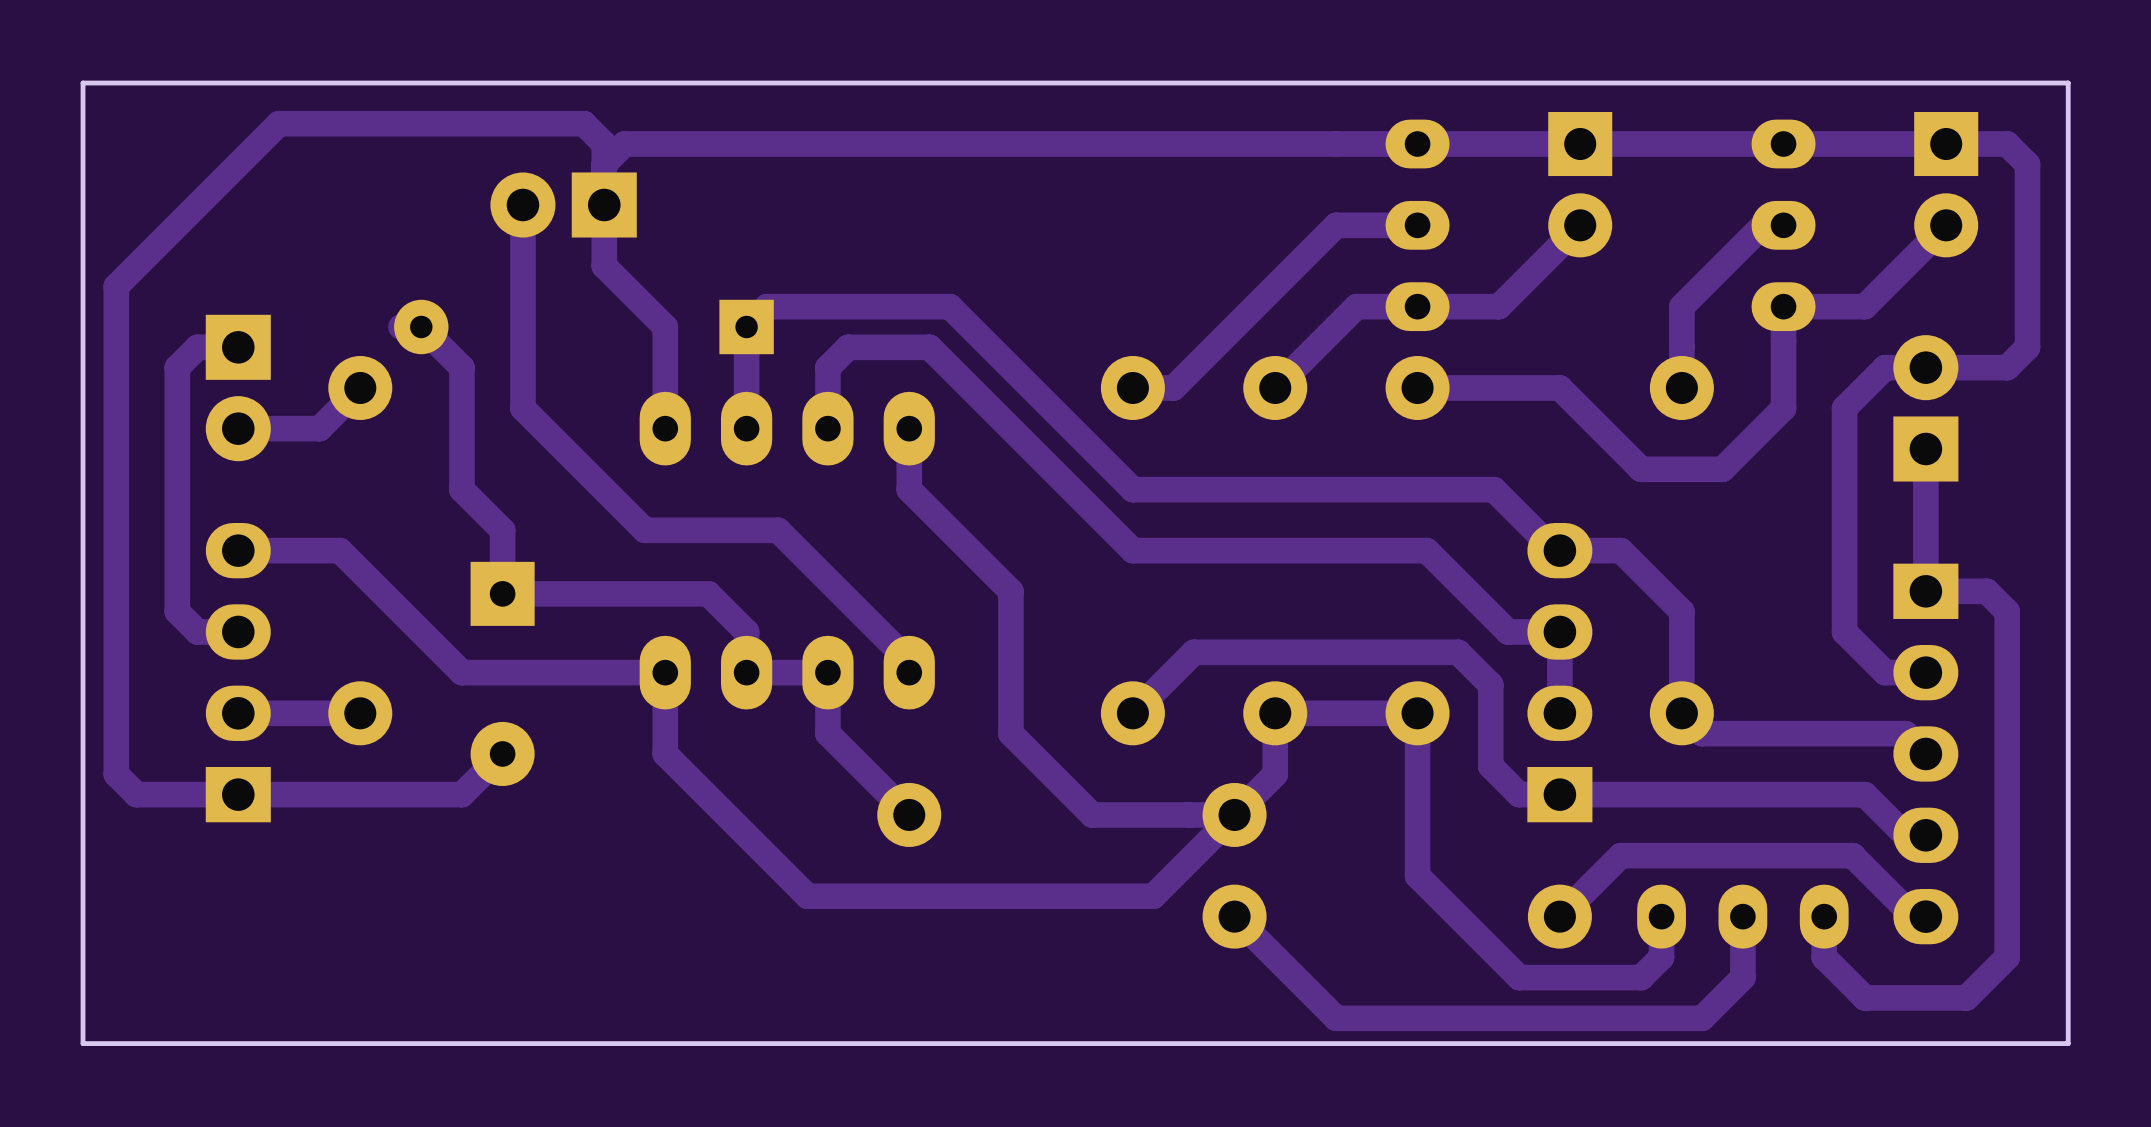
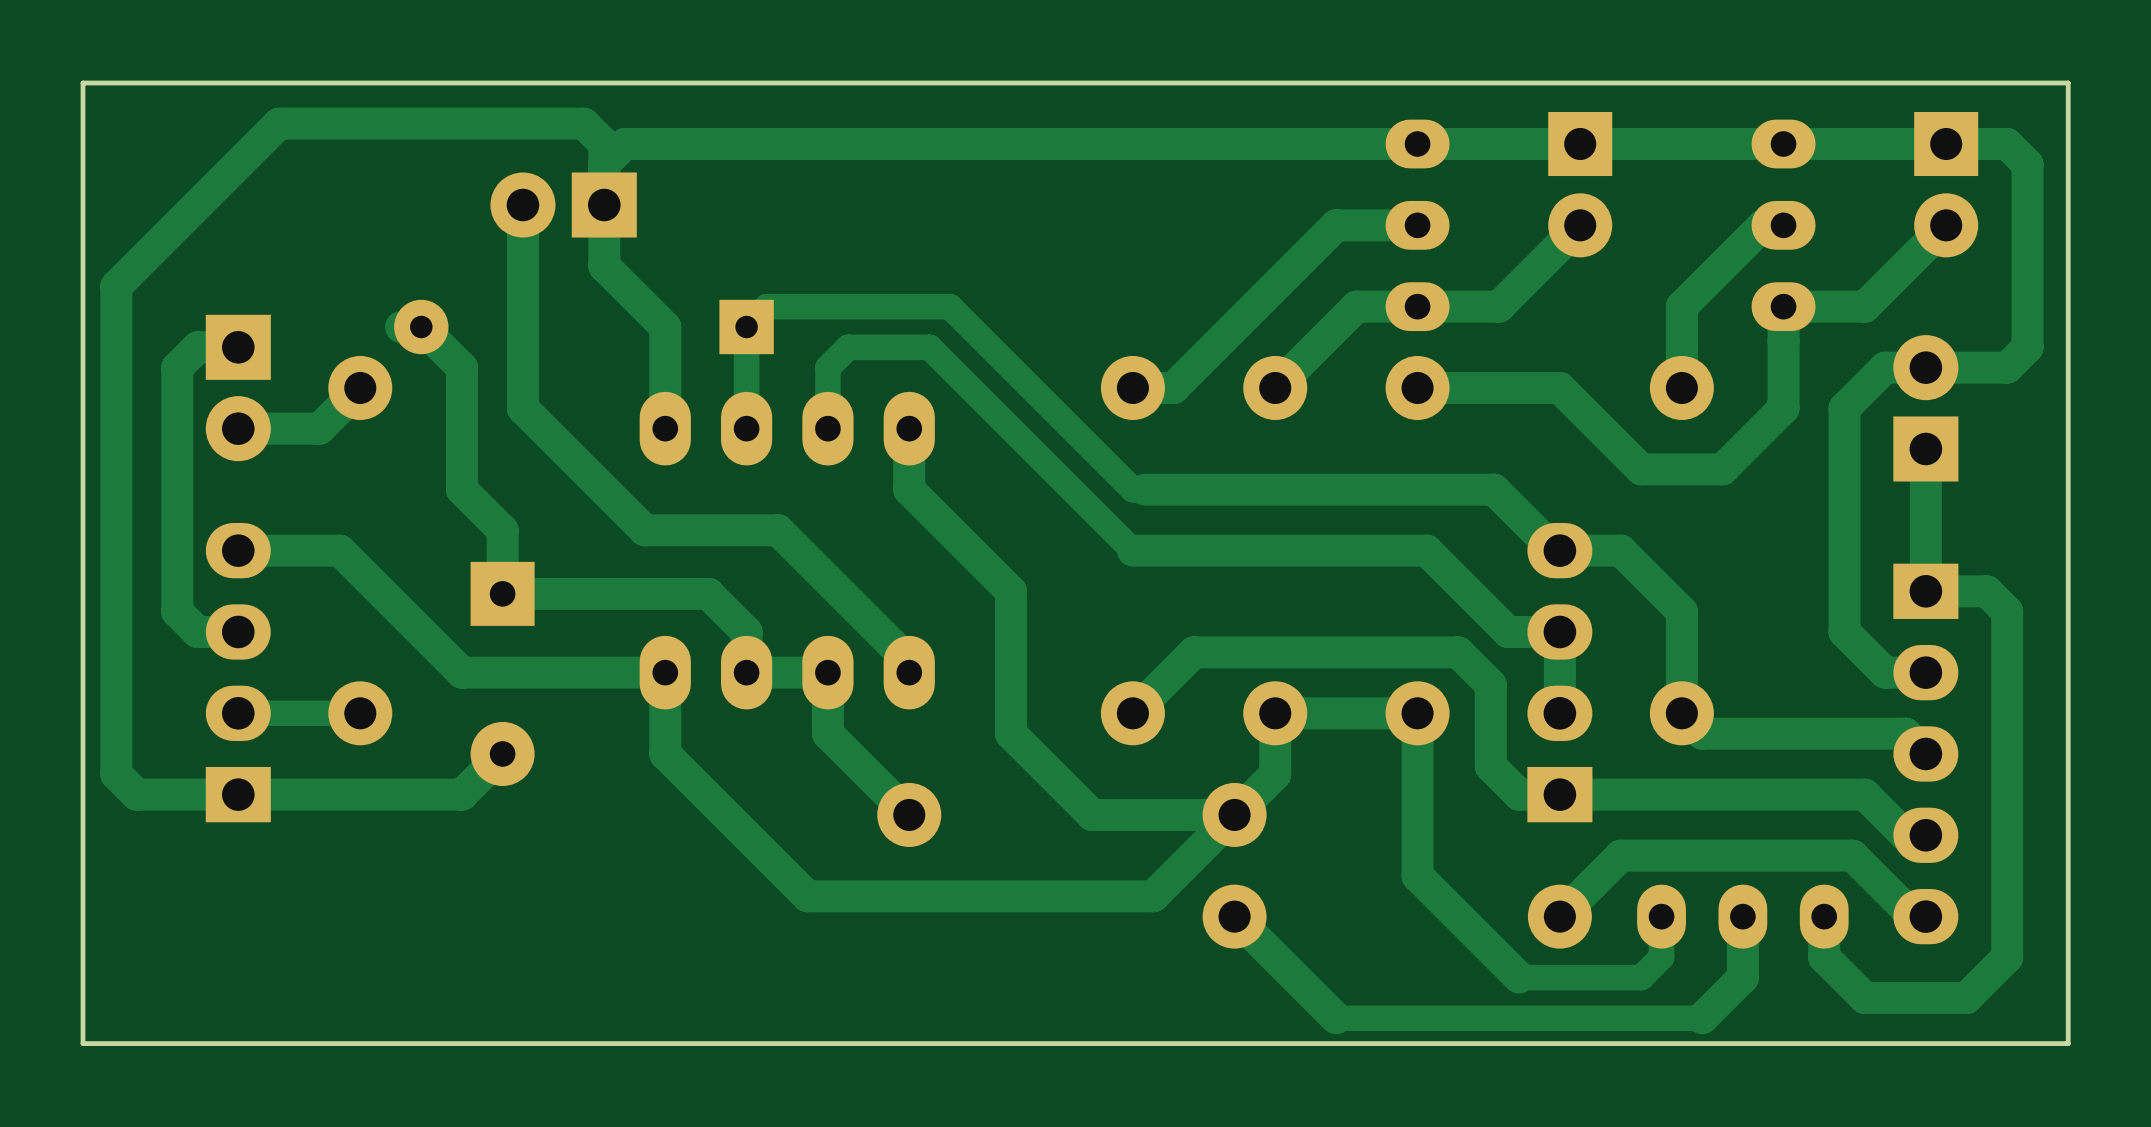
track width: thin (604, 164) (624, 144) (2007, 144) (2027, 164) (2027, 347) (2007, 367) (1885, 367) (1844, 408) (1844, 631) (1885, 672) (1925, 672) -> thick (604, 164) (624, 144) (2007, 144) (2027, 164) (2027, 347) (2007, 367) (1885, 367) (1844, 408) (1844, 631) (1885, 672) (1925, 672)
track width: thin (522, 205) (522, 408) (644, 530) (778, 530) (909, 661) (909, 672) -> thick (522, 205) (522, 408) (644, 530) (778, 530) (909, 661) (909, 672)
track width: thin (1417, 225) (1336, 225) (1173, 387) (1132, 387) -> thick (1417, 225) (1336, 225) (1173, 387) (1132, 387)
track width: thin (1580, 225) (1498, 306) (1356, 306) (1275, 387) -> thick (1580, 225) (1498, 306) (1356, 306) (1275, 387)
track width: thin (1783, 225) (1763, 225) (1681, 306) (1681, 387) -> thick (1783, 225) (1763, 225) (1681, 306) (1681, 387)
track width: thin (1946, 225) (1864, 306) (1783, 306) (1783, 408) (1722, 469) (1641, 469) (1559, 387) (1417, 387) -> thick (1946, 225) (1864, 306) (1783, 306) (1783, 408) (1722, 469) (1641, 469) (1559, 387) (1417, 387)
track width: thin (400, 326) (421, 326) (461, 367) (461, 489) (502, 530) (502, 593) (708, 593) (746, 631) (746, 672) (827, 672) (827, 733) (909, 814) -> thick (400, 326) (421, 326) (461, 367) (461, 489) (502, 530) (502, 593) (708, 593) (746, 631) (746, 672) (827, 672) (827, 733) (909, 814)
track width: thin (238, 347) (197, 347) (177, 367) (177, 611) (197, 631) (238, 631) -> thick (238, 347) (197, 347) (177, 367) (177, 611) (197, 631) (238, 631)
track width: thin (360, 387) (319, 428) (238, 428) -> thick (360, 387) (319, 428) (238, 428)
track width: thin (665, 428) (665, 326) (604, 265) (604, 144) (583, 123) (278, 123) (116, 286) (116, 774) (136, 794) (461, 794) (502, 753) -> thick (665, 428) (665, 326) (604, 265) (604, 144) (583, 123) (278, 123) (116, 286) (116, 774) (136, 794) (461, 794) (502, 753)
track width: thin (909, 428) (909, 489) (1010, 591) (1010, 733) (1092, 814) (1234, 814) -> thick (909, 428) (909, 489) (1010, 591) (1010, 733) (1092, 814) (1234, 814)
track width: thin (1925, 448) (1925, 591) (1986, 591) (2007, 611) (2007, 957) (1966, 997) (1864, 997) (1824, 957) (1824, 916) -> thick (1925, 448) (1925, 591) (1986, 591) (2007, 611) (2007, 957) (1966, 997) (1864, 997) (1824, 957) (1824, 916)
track width: thin (1145, 489) (1494, 489) (1555, 550) (1620, 550) (1681, 611) (1681, 713) (1702, 733) (1905, 733) (1925, 753) -> thick (1145, 489) (1494, 489) (1555, 550) (1620, 550) (1681, 611) (1681, 713) (1702, 733) (1905, 733) (1925, 753)
track width: thin (238, 550) (339, 550) (461, 672) (665, 672) (665, 753) (807, 896) (1153, 896) (1275, 774) (1275, 713) (1417, 713) (1417, 875) (1519, 977) -> thick (238, 550) (339, 550) (461, 672) (665, 672) (665, 753) (807, 896) (1153, 896) (1275, 774) (1275, 713) (1417, 713) (1417, 875) (1519, 977)
track width: thin (1132, 550) (1426, 550) (1508, 631) (1559, 631) (1559, 713) -> thick (1132, 550) (1426, 550) (1508, 631) (1559, 631) (1559, 713)
track width: thin (1132, 713) (1193, 652) (1458, 652) (1490, 684) (1490, 766) (1519, 794) (1864, 794) (1905, 835) (1925, 835) -> thick (1132, 713) (1193, 652) (1458, 652) (1490, 684) (1490, 766) (1519, 794) (1864, 794) (1905, 835) (1925, 835)
track width: thin (1234, 916) (1336, 1018) -> thick (1234, 916) (1336, 1018)
track width: thin (1742, 916) (1742, 977) (1702, 1018) -> thick (1742, 916) (1742, 977) (1702, 1018)
track width: thin (1925, 916) (1913, 916) (1852, 855) (1620, 855) (1559, 916) -> thick (1925, 916) (1913, 916) (1852, 855) (1620, 855) (1559, 916)

